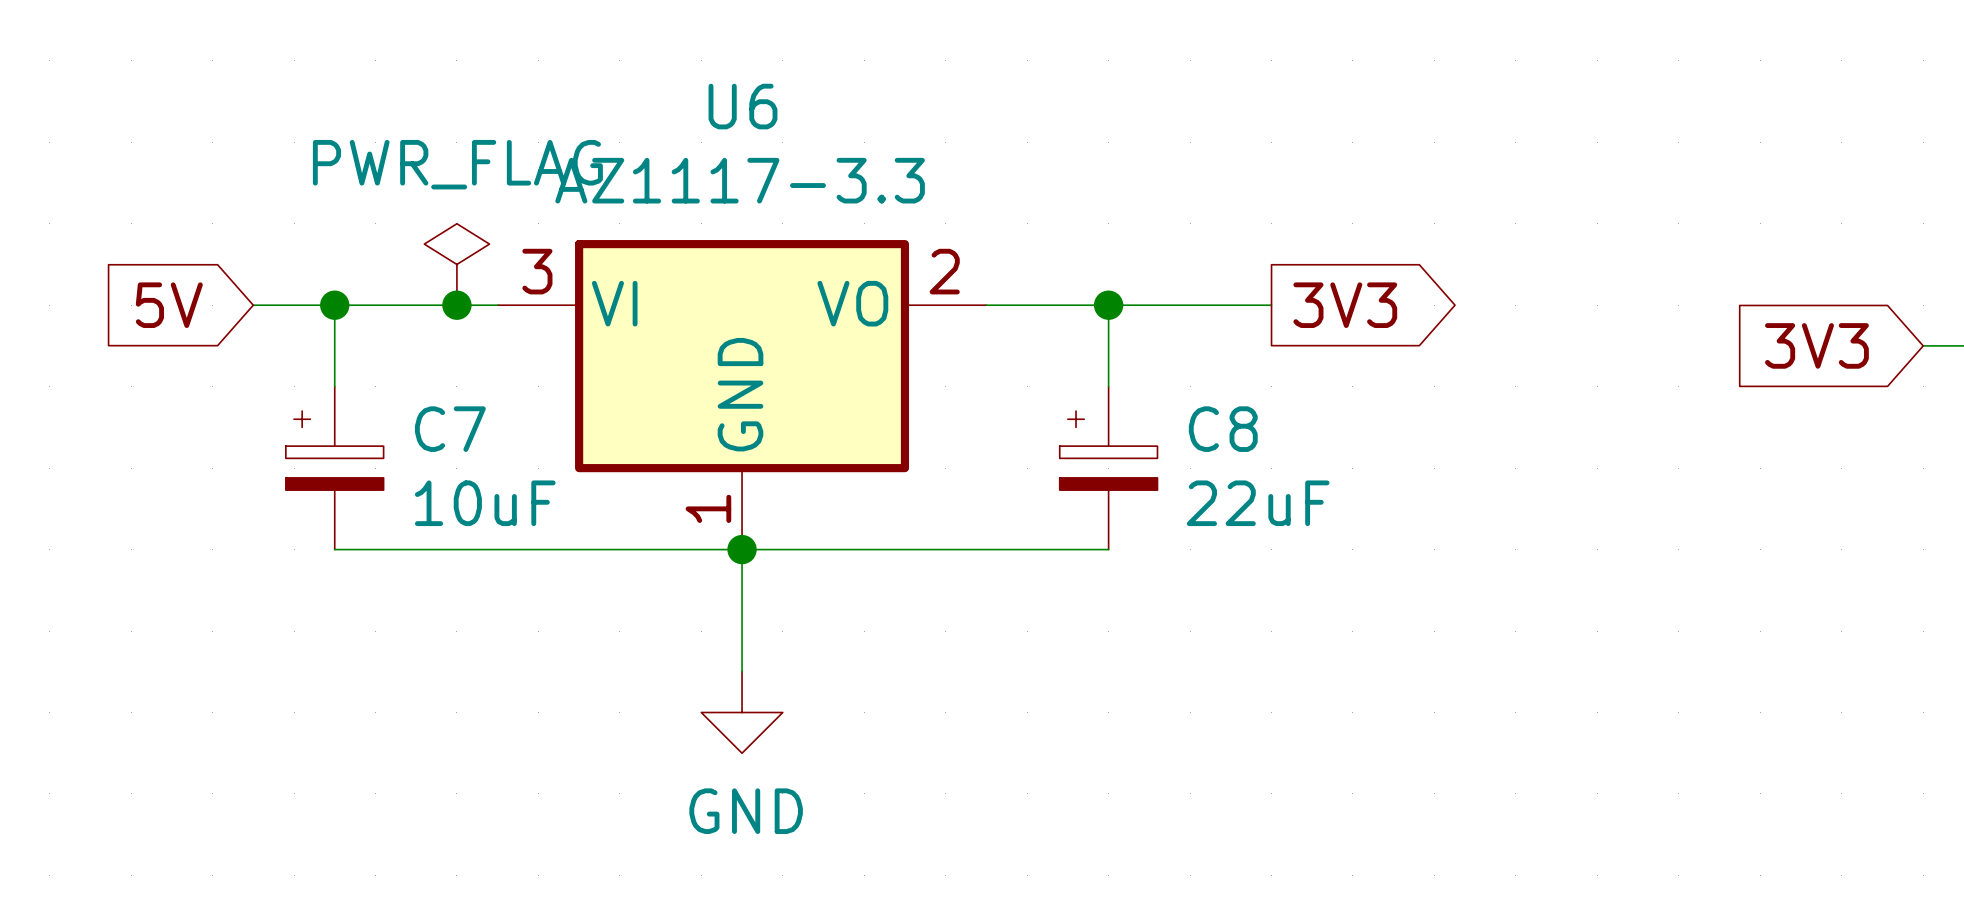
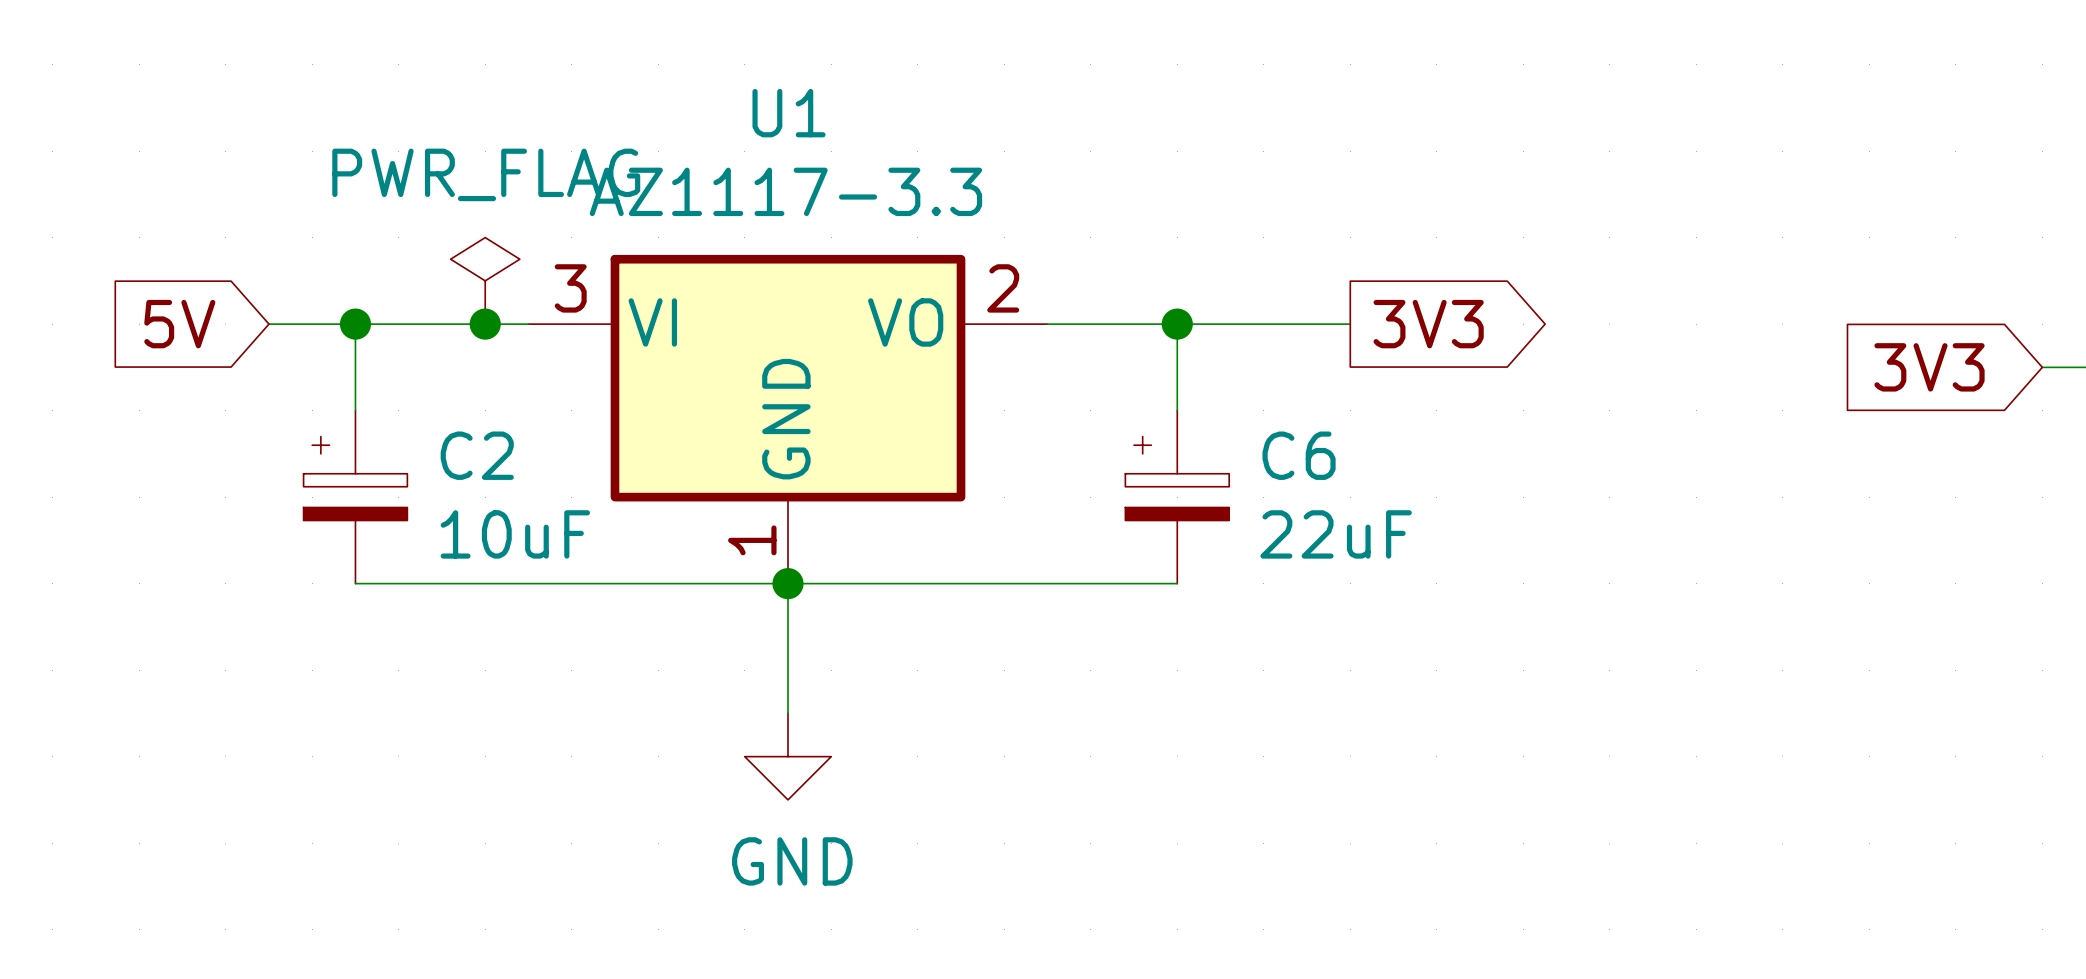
U6 name: U6 (743, 106) -> U1 (789, 113)
C7 name: C7 (450, 429) -> C2 (477, 455)
C8 name: C8 (1223, 429) -> C6 (1299, 455)

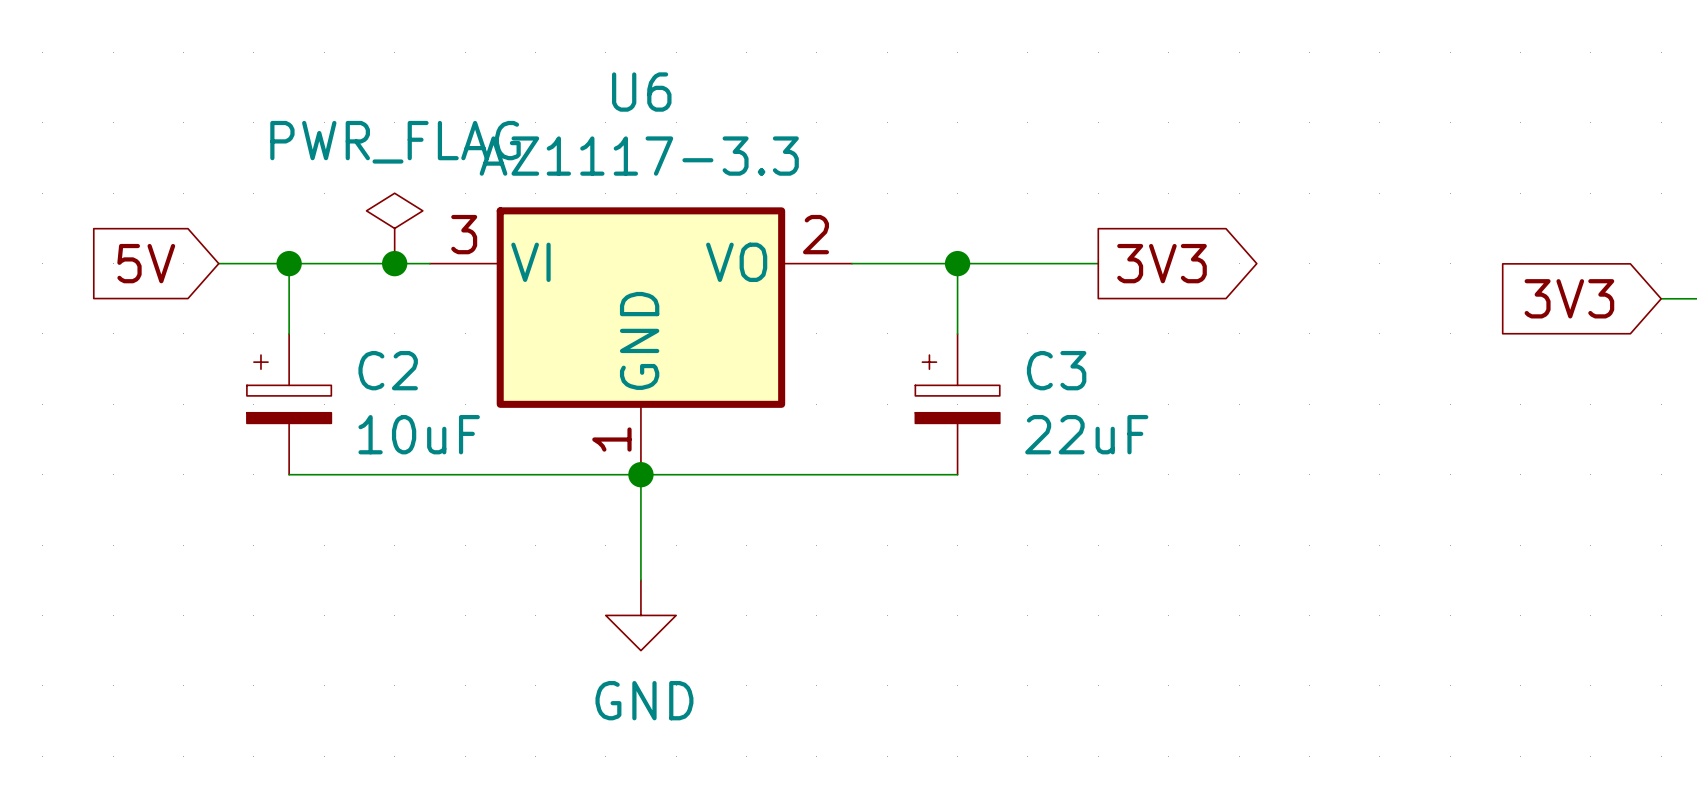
U1 name: U1 (789, 113) -> U6 (641, 92)
C6 name: C6 (1299, 455) -> C3 (1056, 370)

